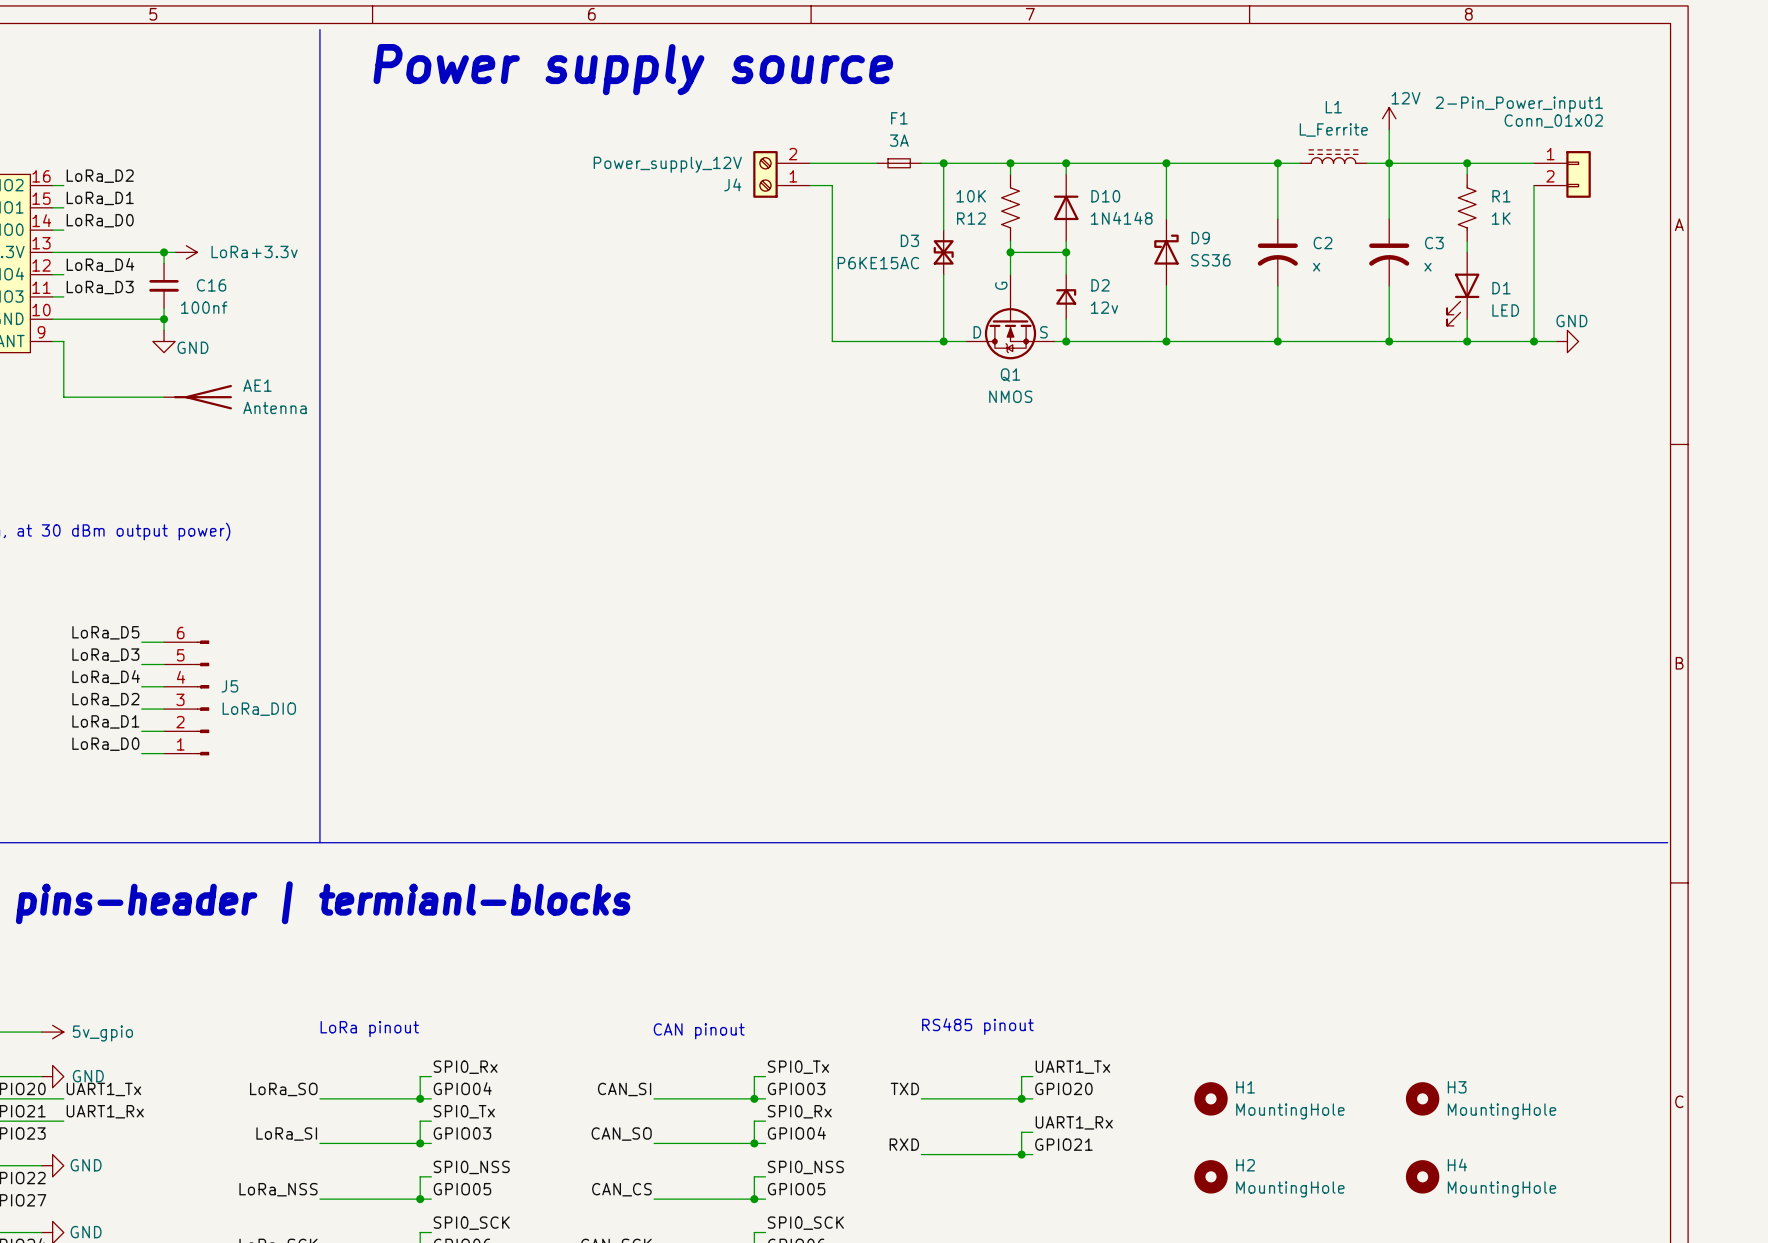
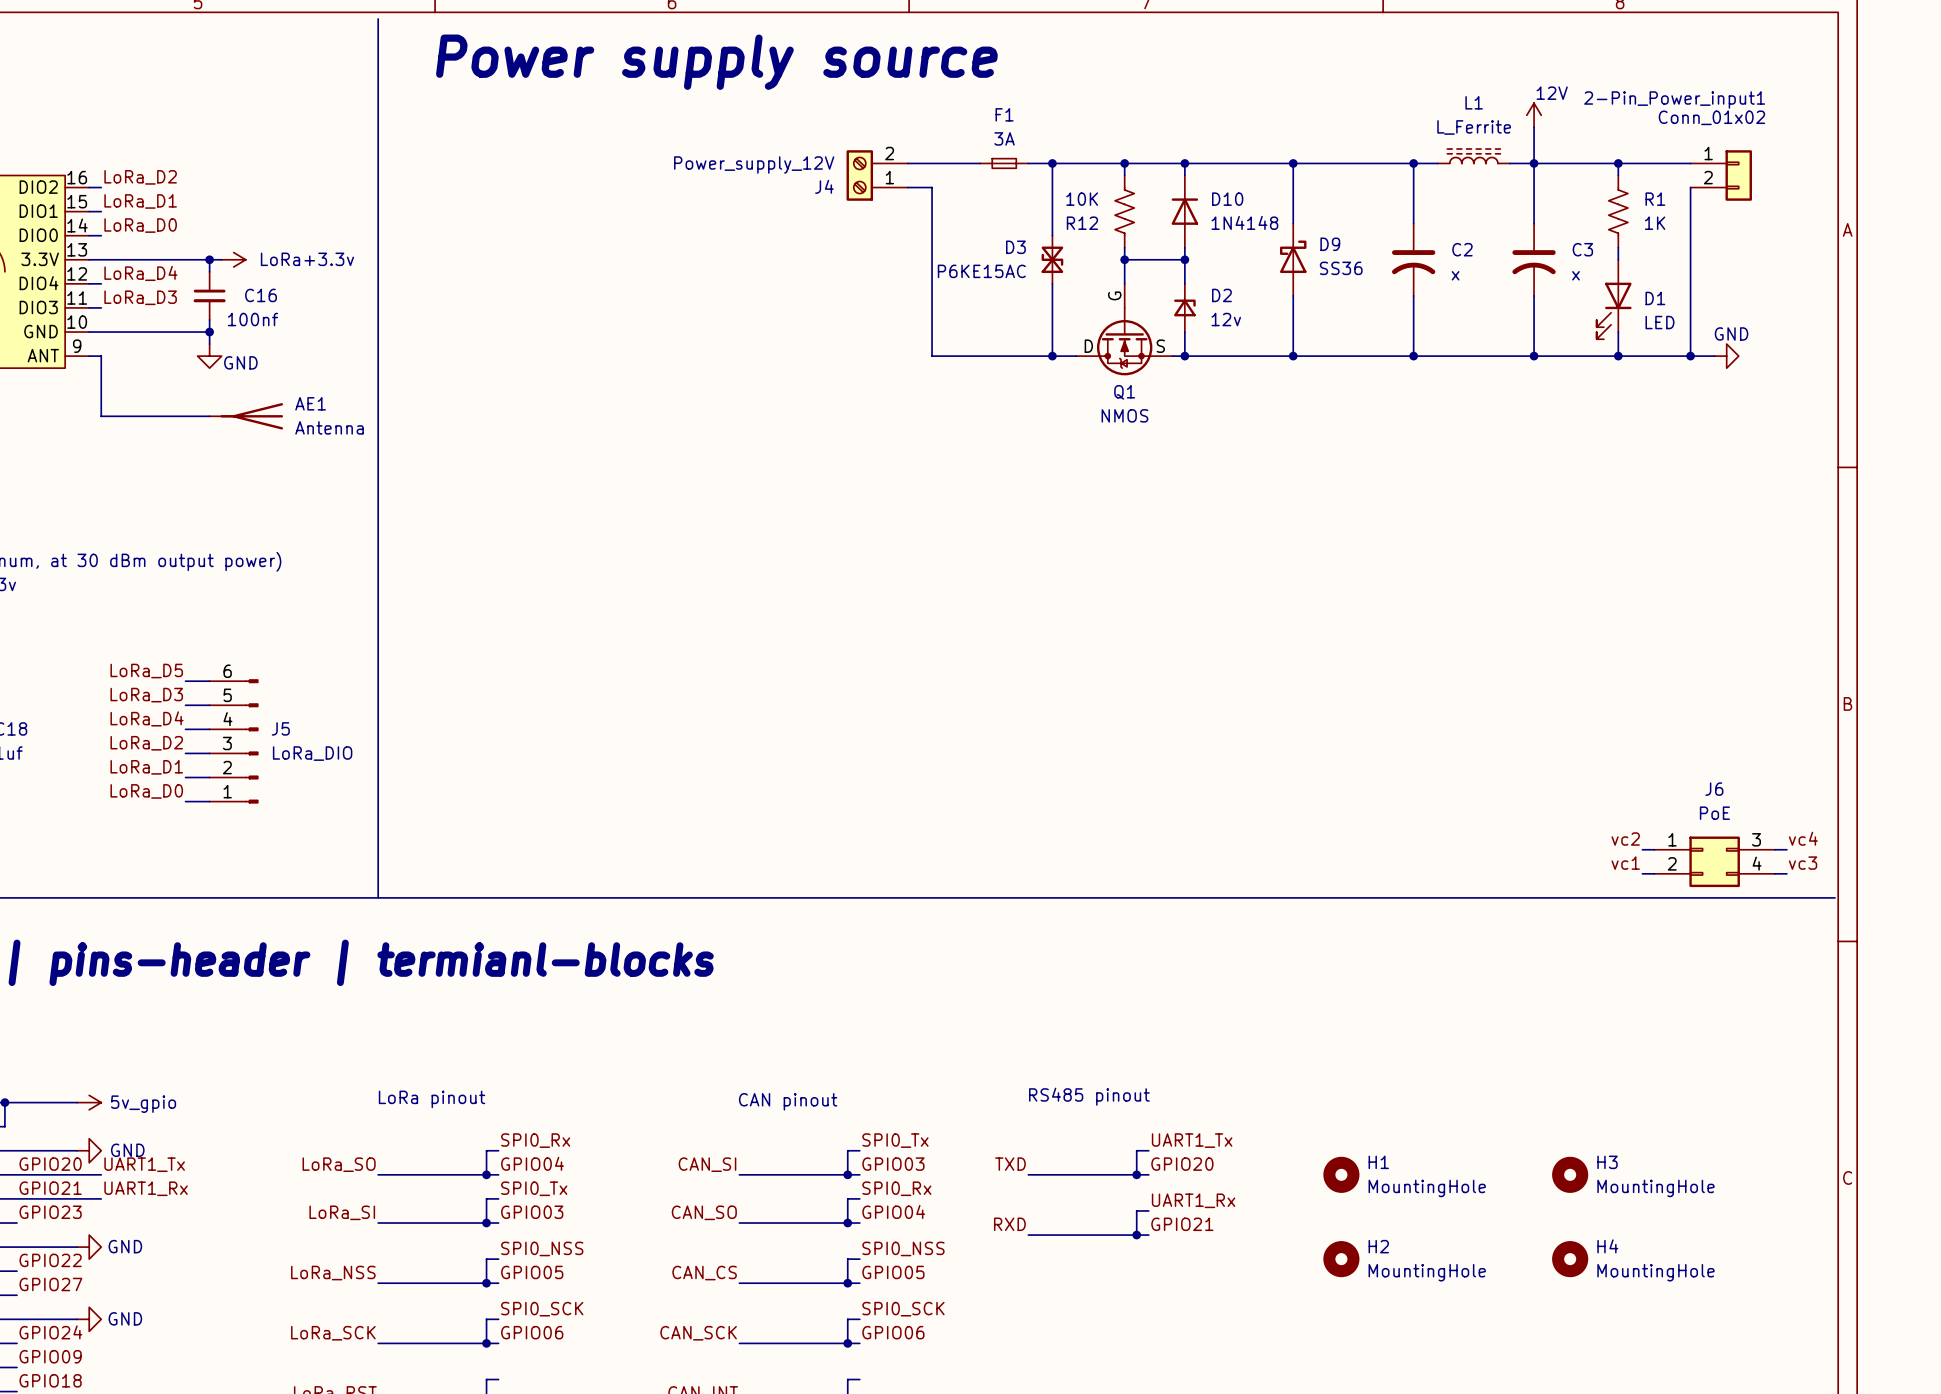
label: none -> vc4 (1803, 838)
label: none -> vc2 (1625, 839)
wire: none -> (1642, 849) (1654, 849)
wire: none -> (1774, 849) (1786, 849)
J6: none -> PoE (1714, 861)
label: none -> vc1 (1625, 863)
label: none -> vc3 (1803, 863)
wire: none -> (1642, 873) (1654, 873)
wire: none -> (1774, 873) (1786, 873)

